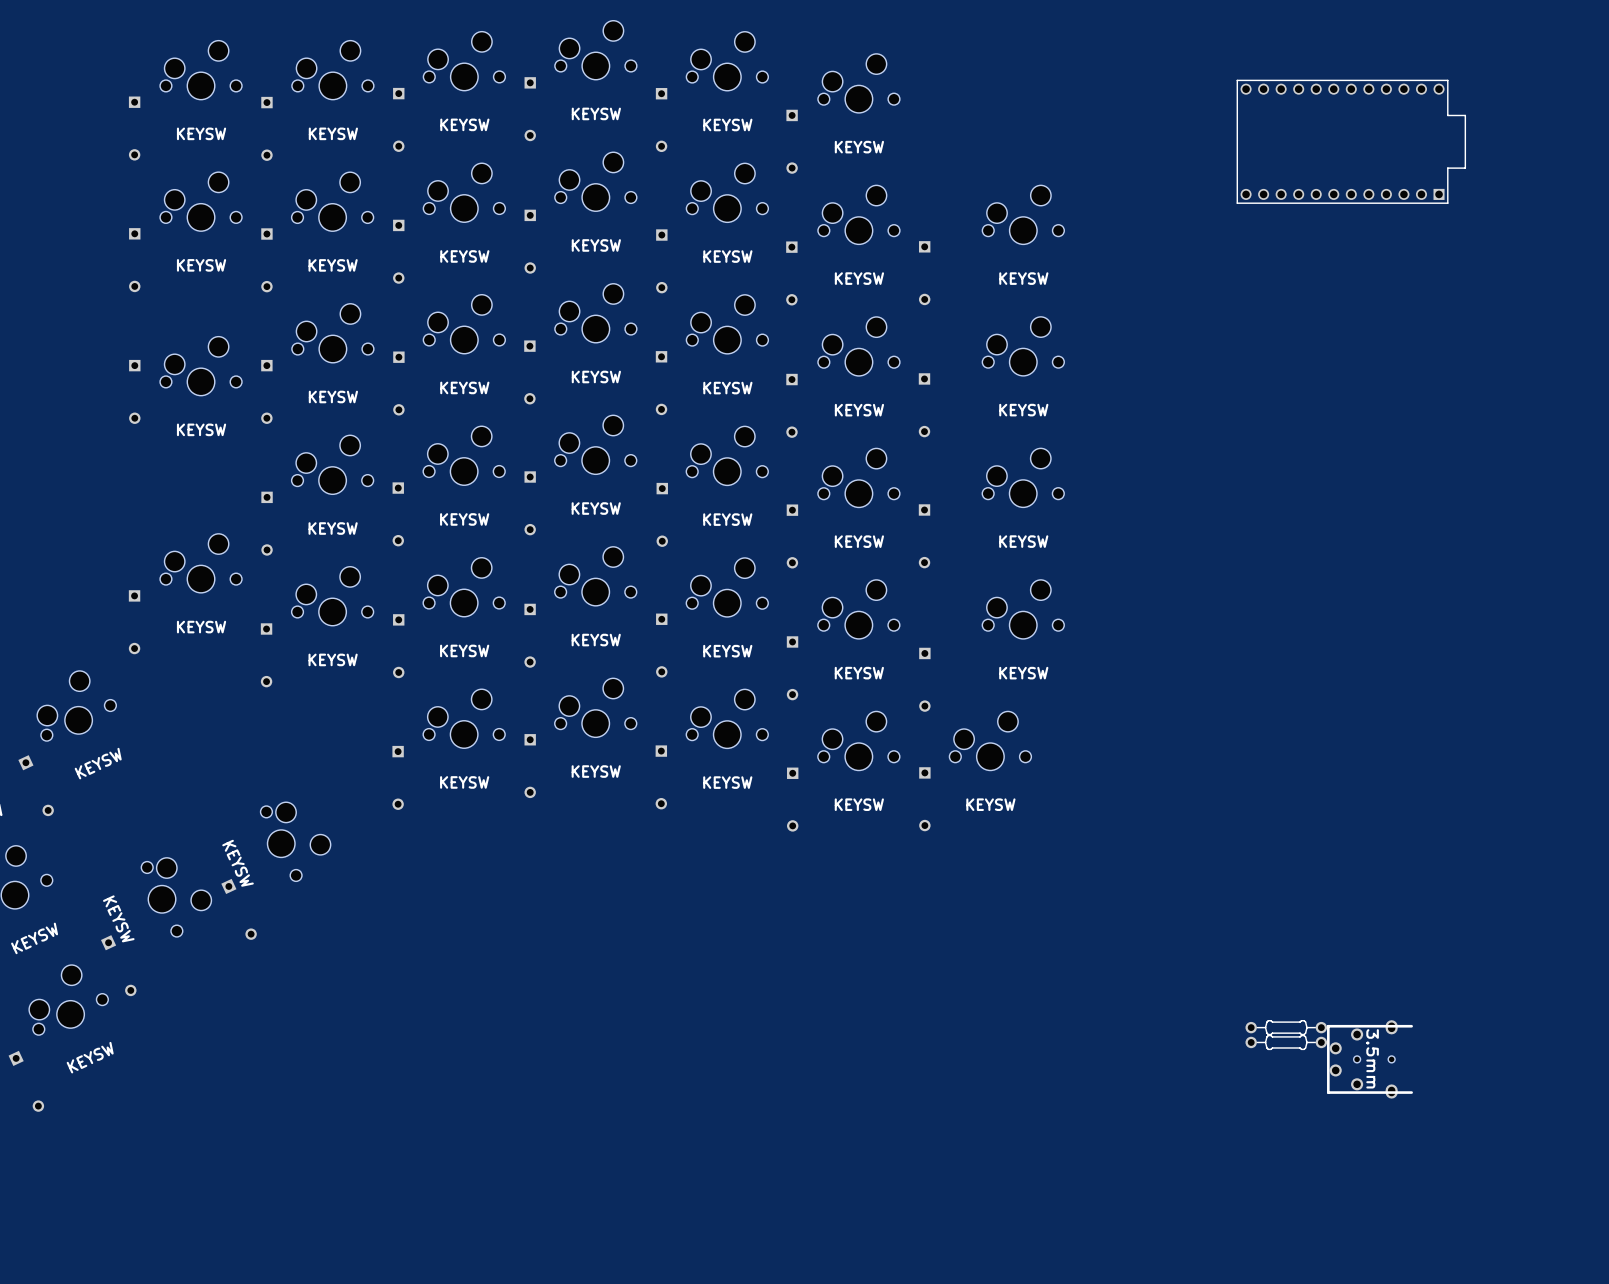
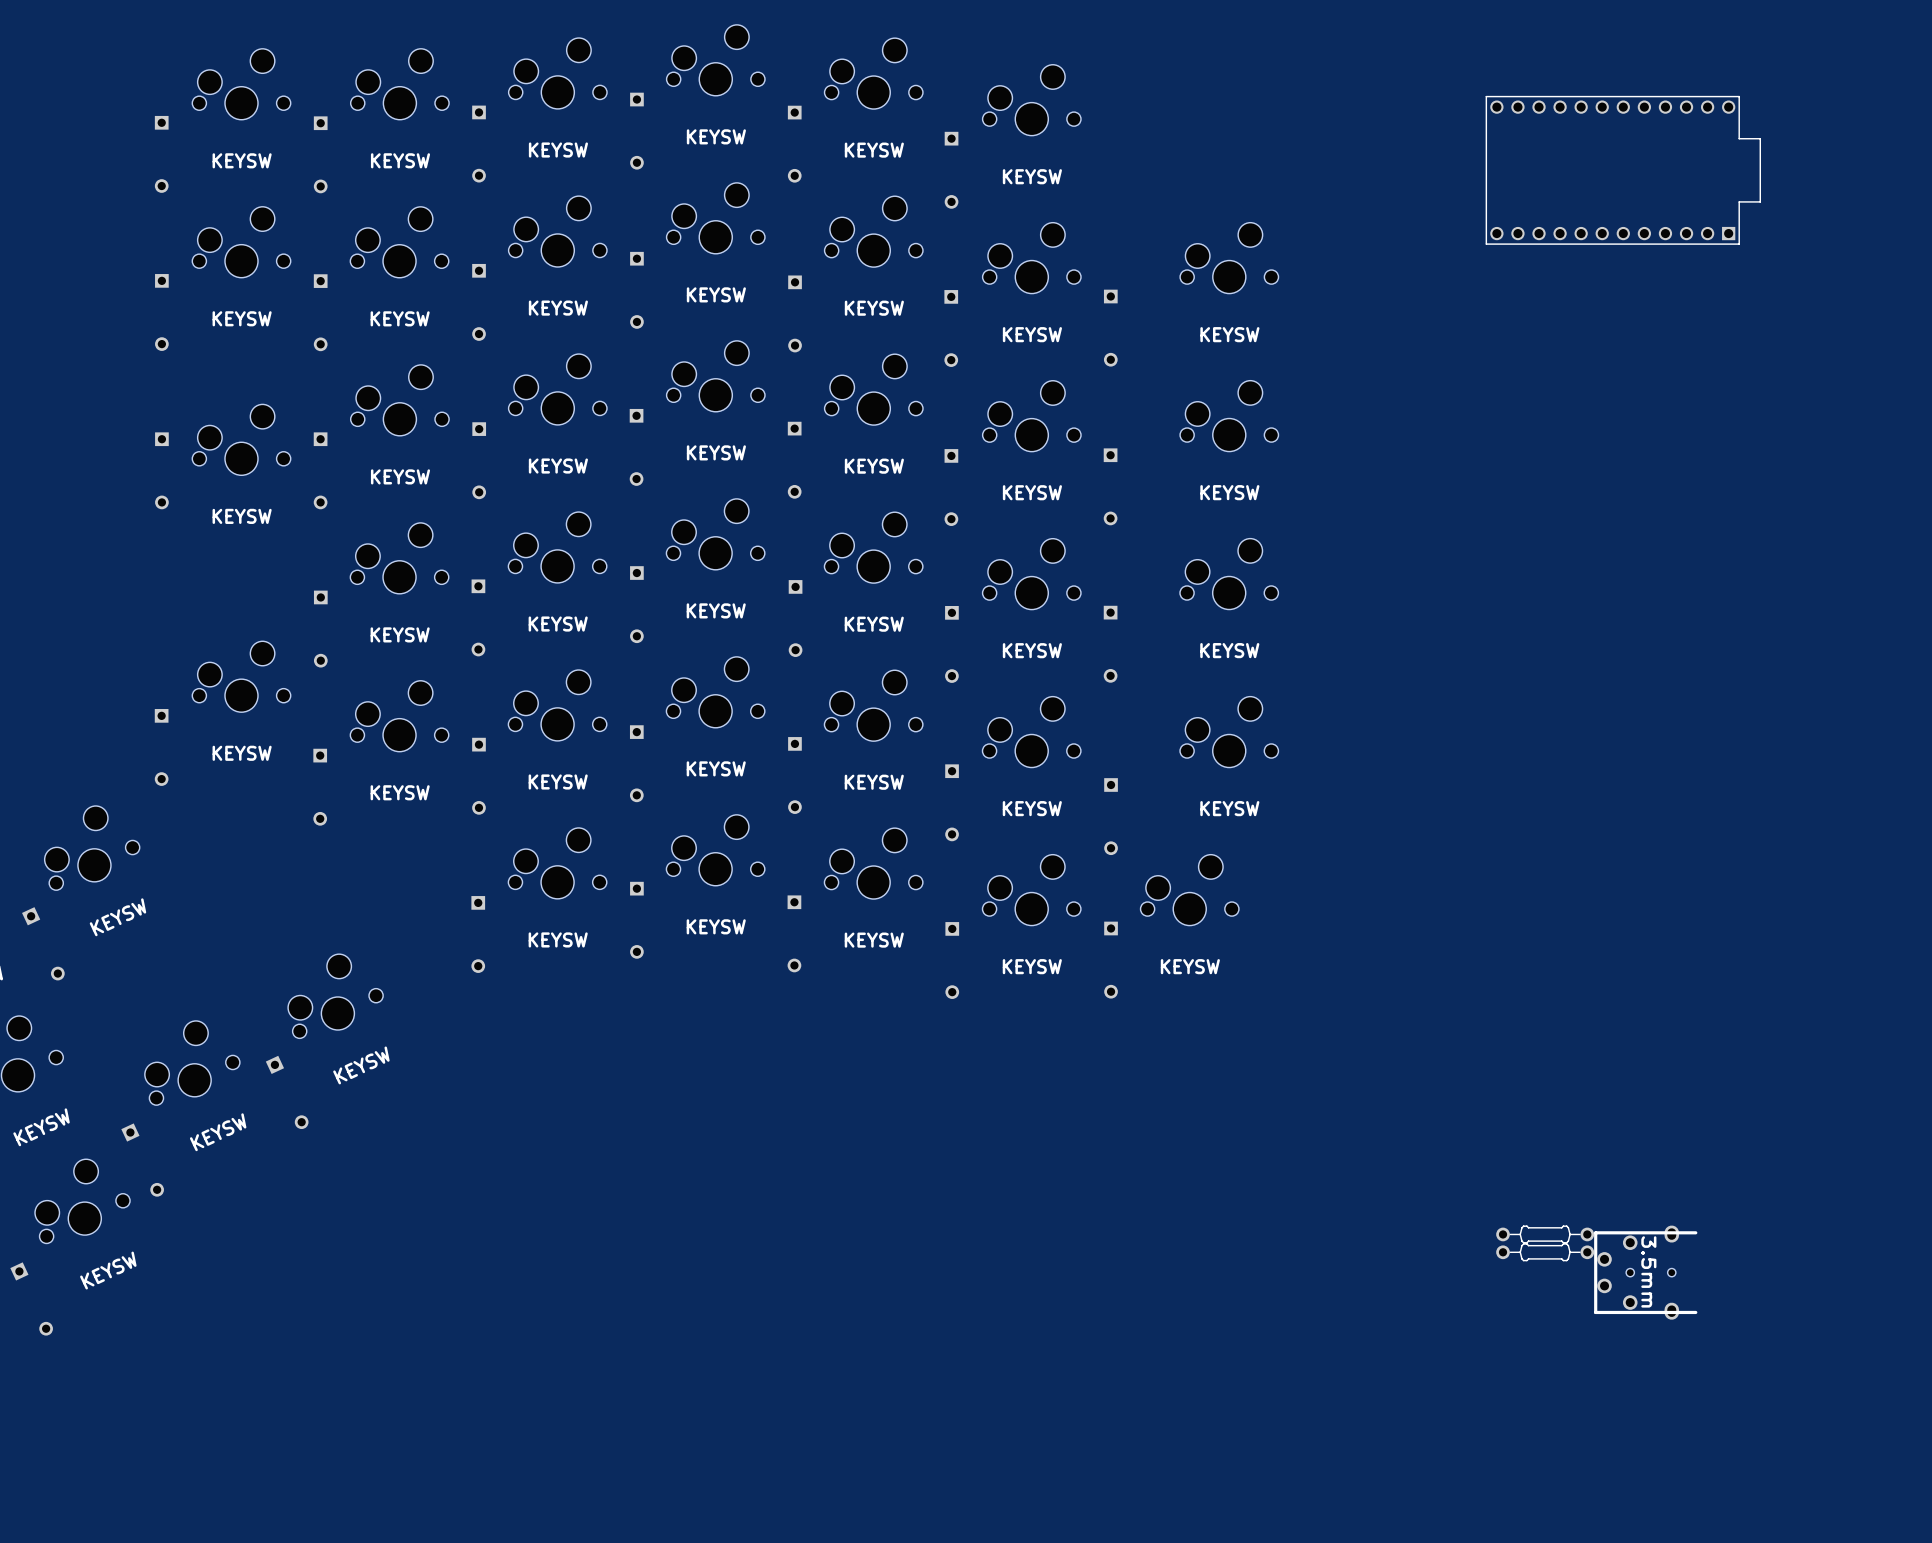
part rotation: 0° (295, 841) -> 90° counterclockwise (335, 996)
part rotation: 0° (176, 897) -> 90° counterclockwise (192, 1063)

